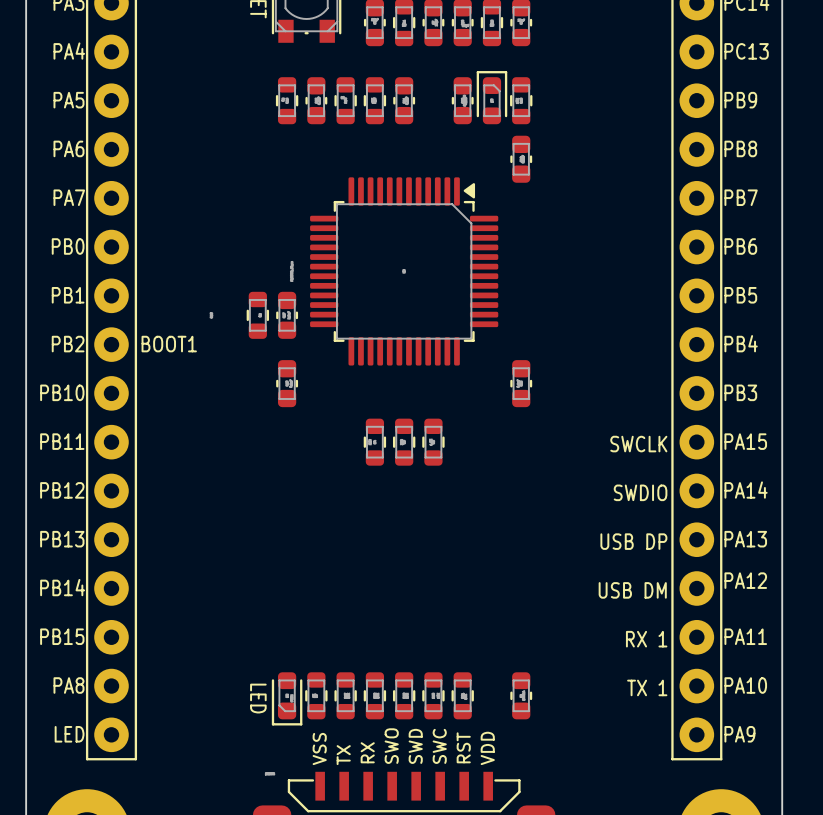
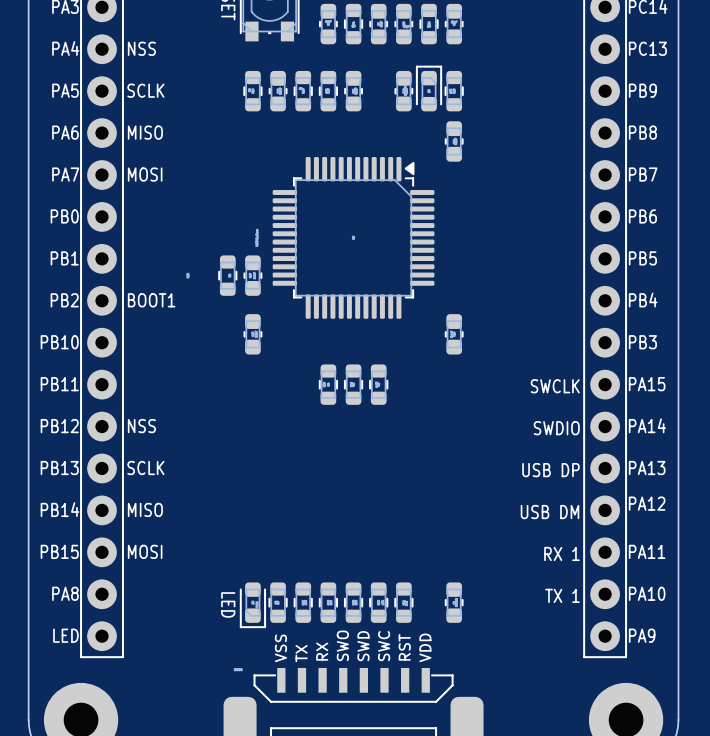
text: none -> NSS (141, 48)
text: none -> SCLK (145, 90)
text: none -> MISO (145, 132)
text: none -> MOSI (145, 174)
text: none -> NSS (141, 426)
text: none -> SCLK (145, 468)
text: none -> MISO (145, 509)
text: none -> MOSI (145, 551)

